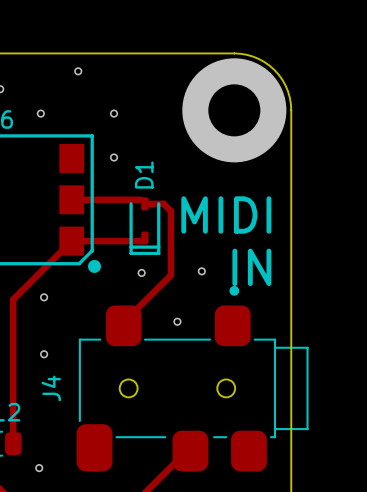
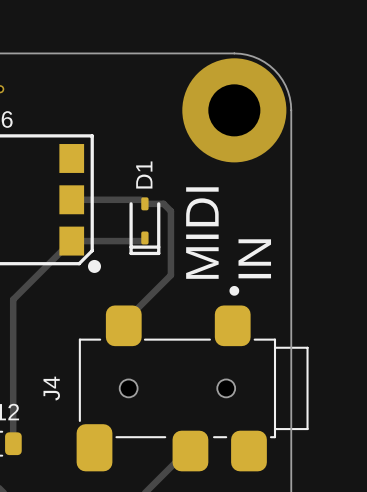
via: (78, 71) -> none
via: (40, 113) -> none
via: (114, 113) -> none
via: (114, 157) -> none
text rotation: 0° (226, 214) -> 90° counterclockwise (202, 233)
text rotation: 0° (251, 267) -> 90° counterclockwise (254, 258)
via: (201, 271) -> none
via: (141, 272) -> none
via: (44, 297) -> none
via: (177, 321) -> none
via: (44, 354) -> none
via: (39, 468) -> none

